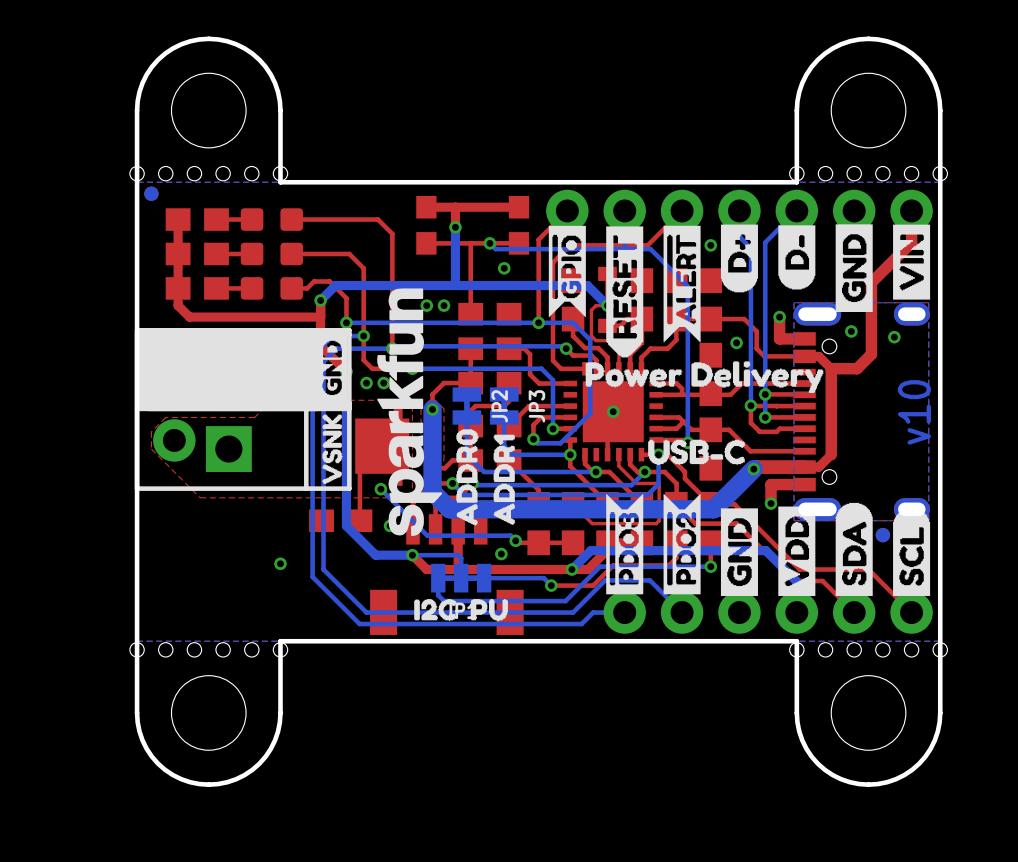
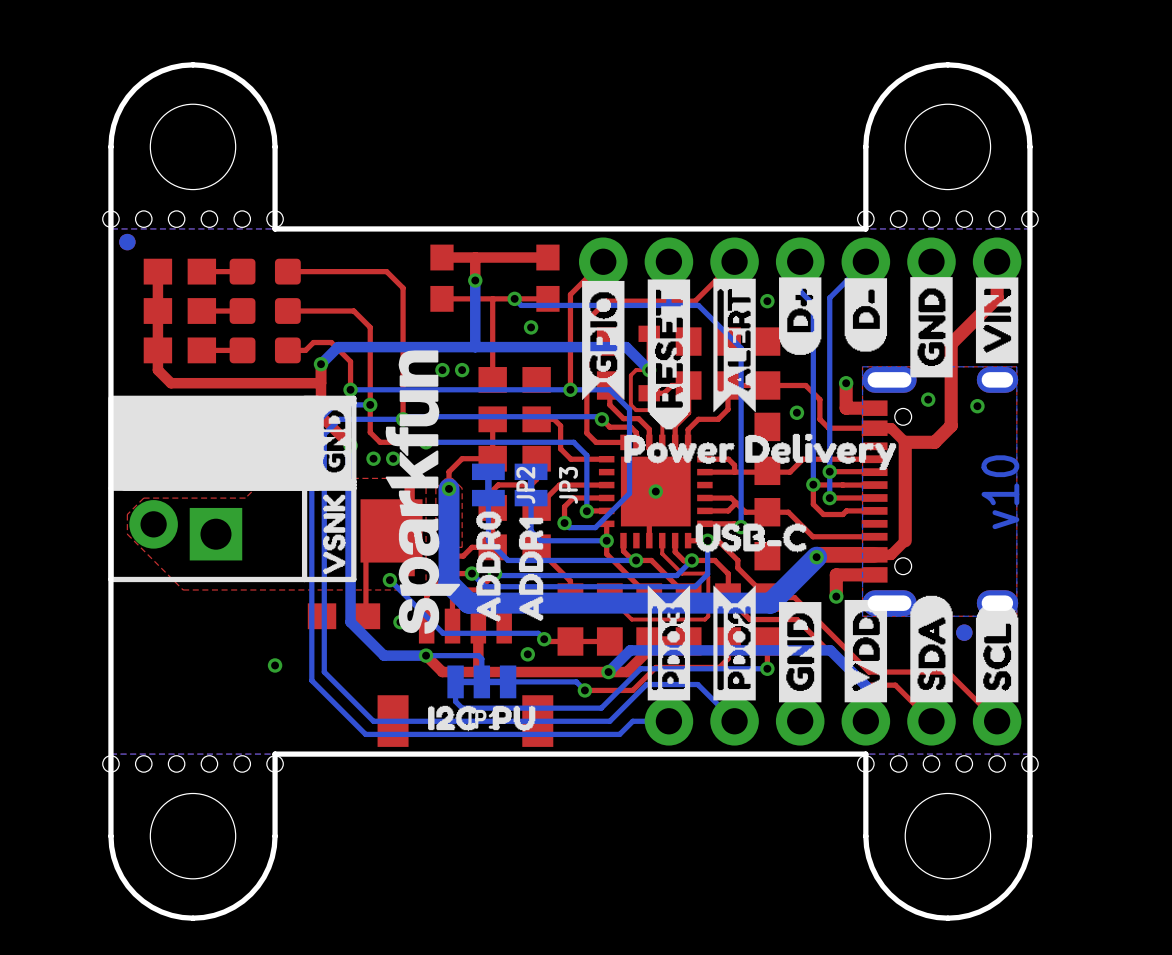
drawing shape: [548, 225, 586, 318] -> [582, 280, 625, 400]

